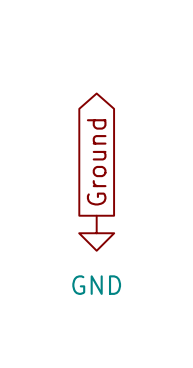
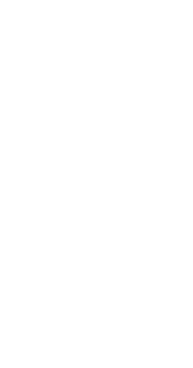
global label: Ground (96, 162) -> none
power symbol: GND (96, 233) -> none

